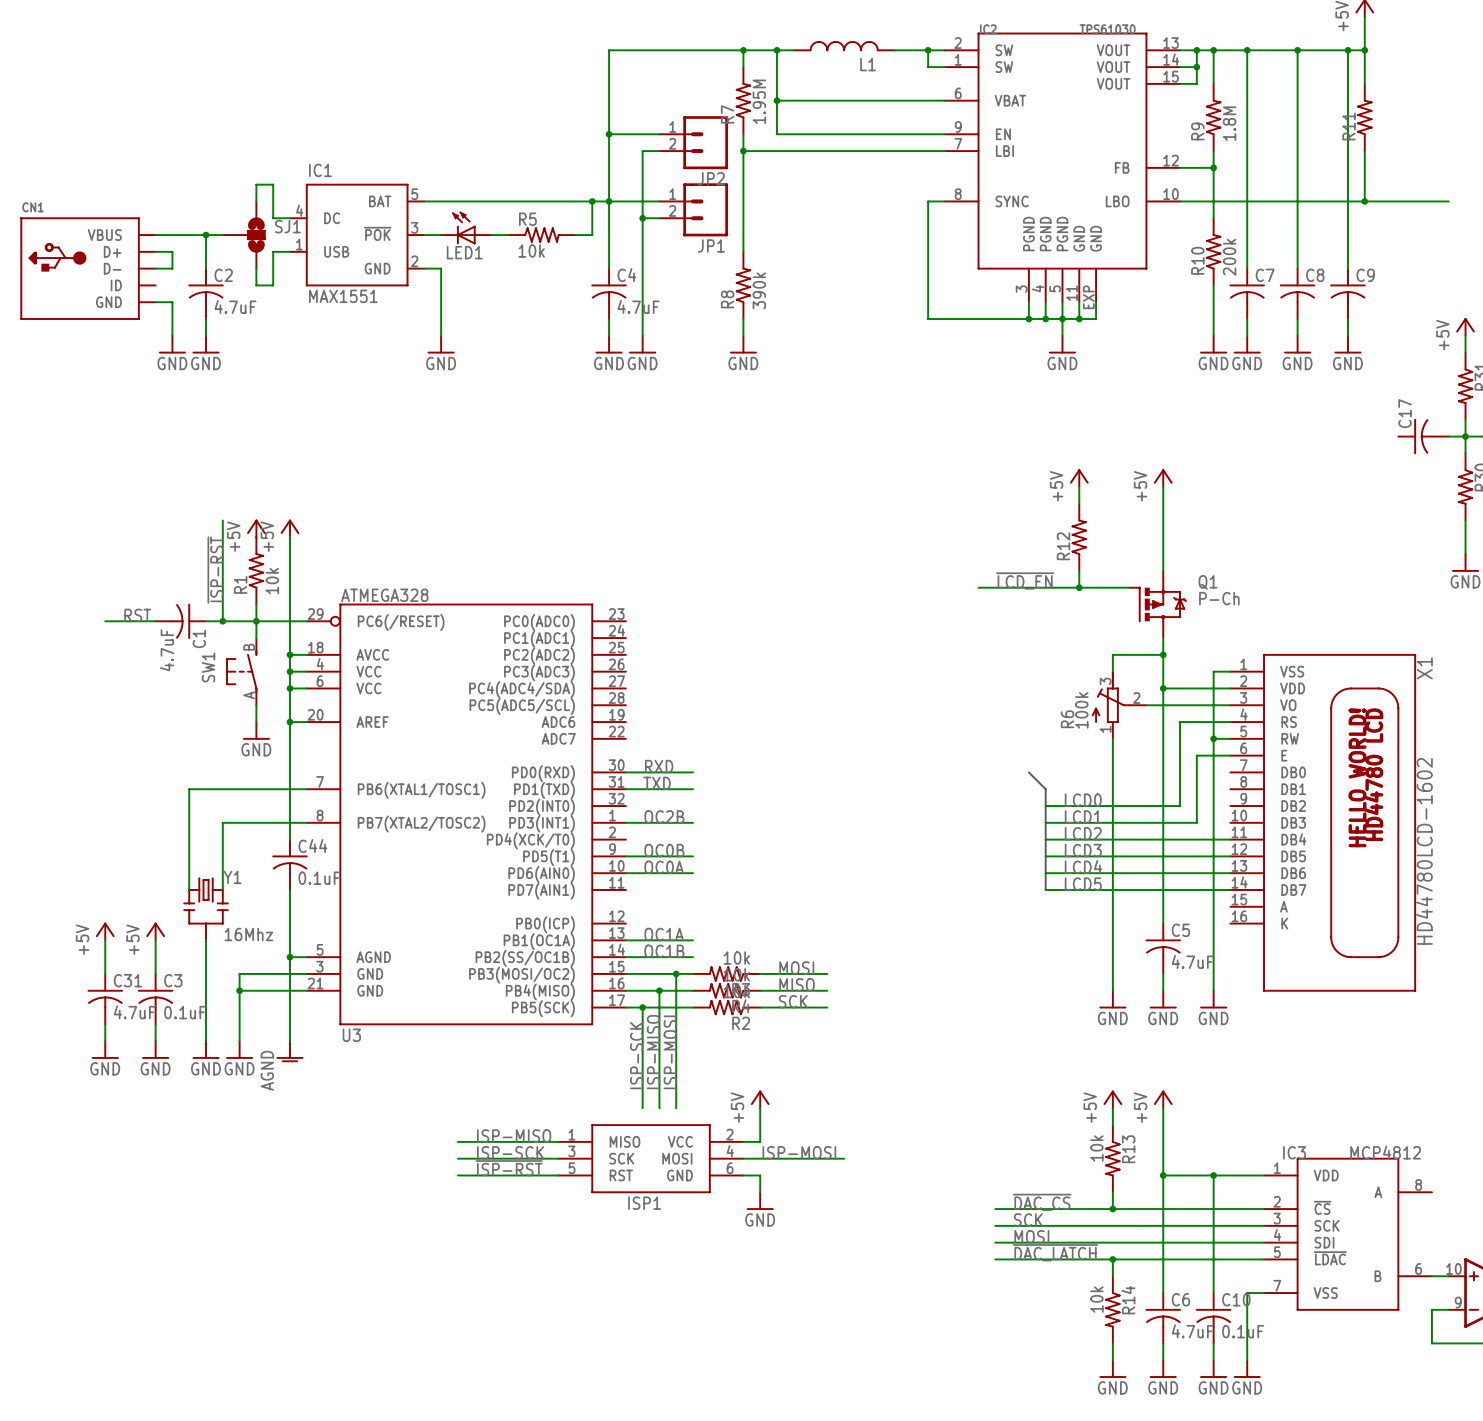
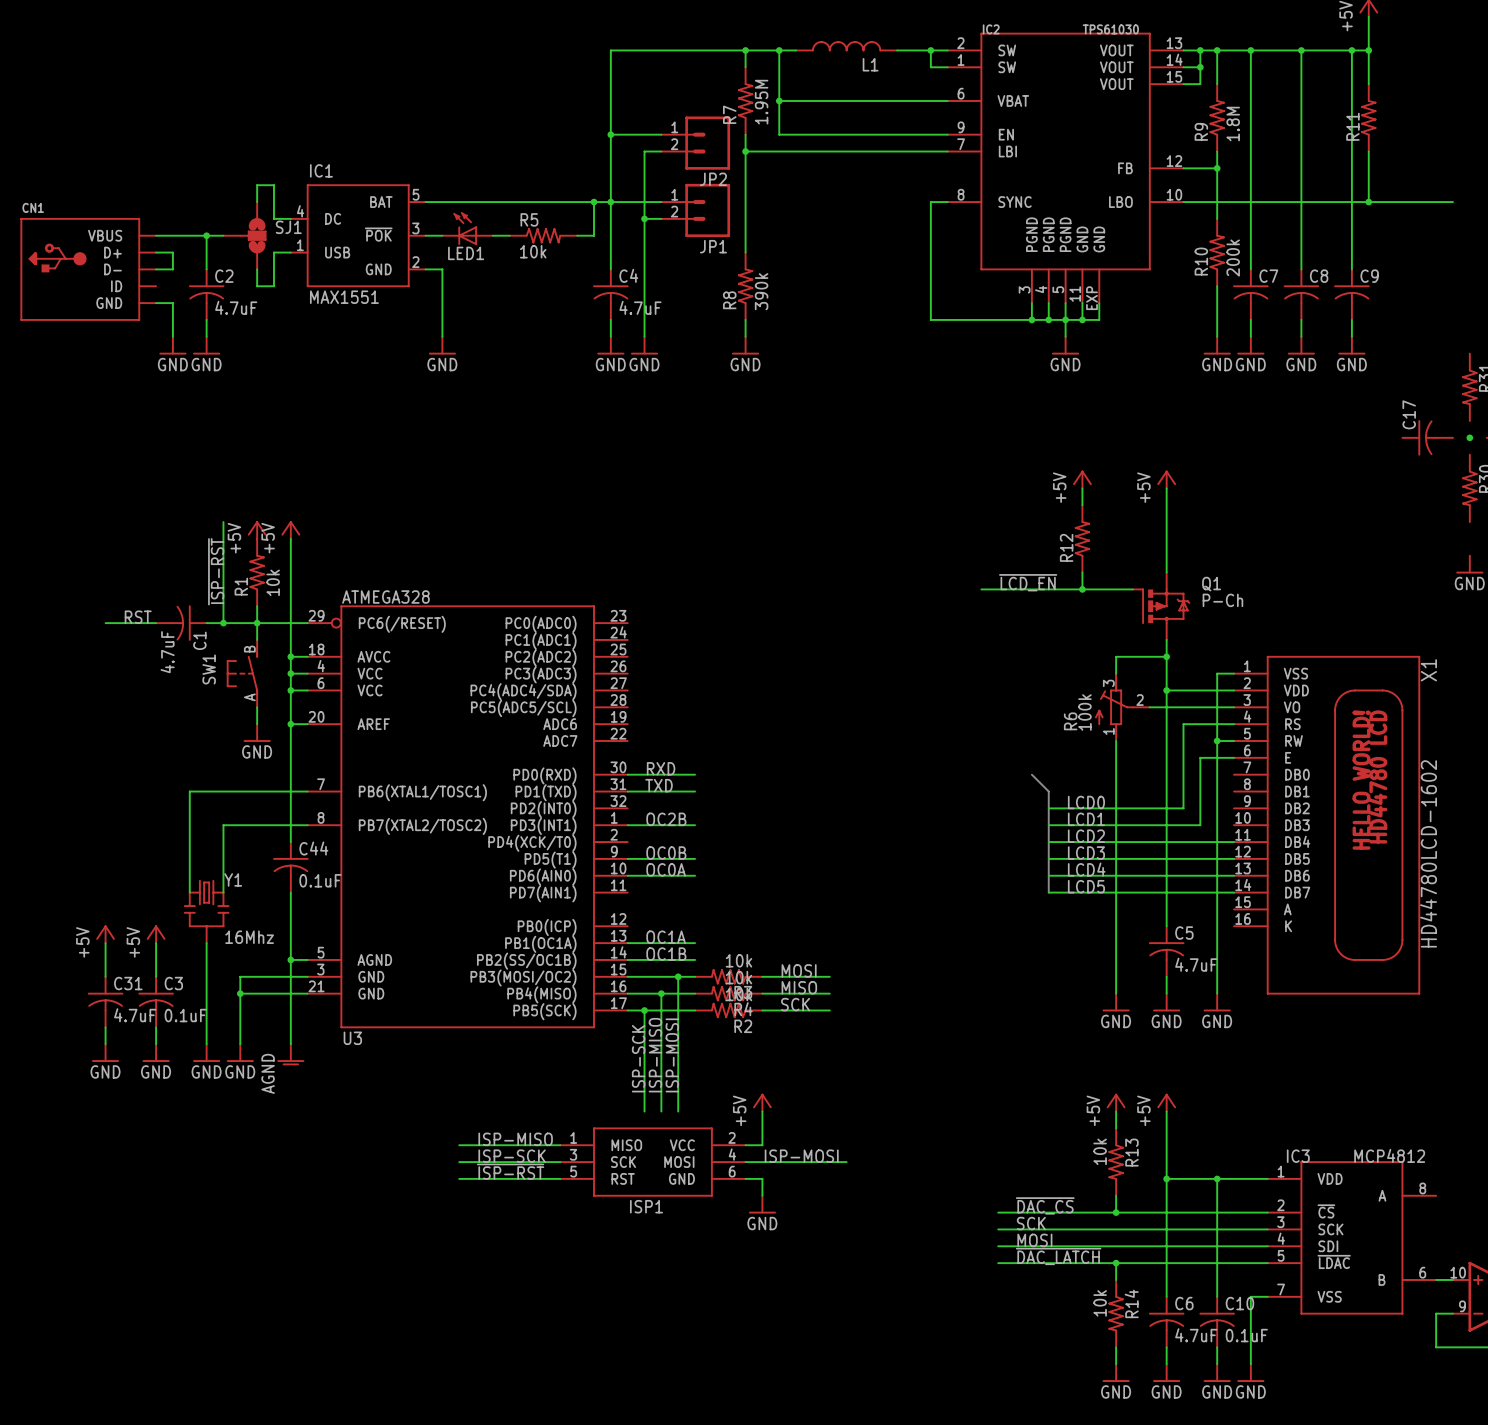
power symbol: +5V (1465, 326) -> none
wire: (1465, 335) (1465, 352) -> none
wire: (1465, 419) (1465, 453) -> none
wire: (1448, 436) (1482, 436) -> none
wire: (1465, 520) (1465, 554) -> none

